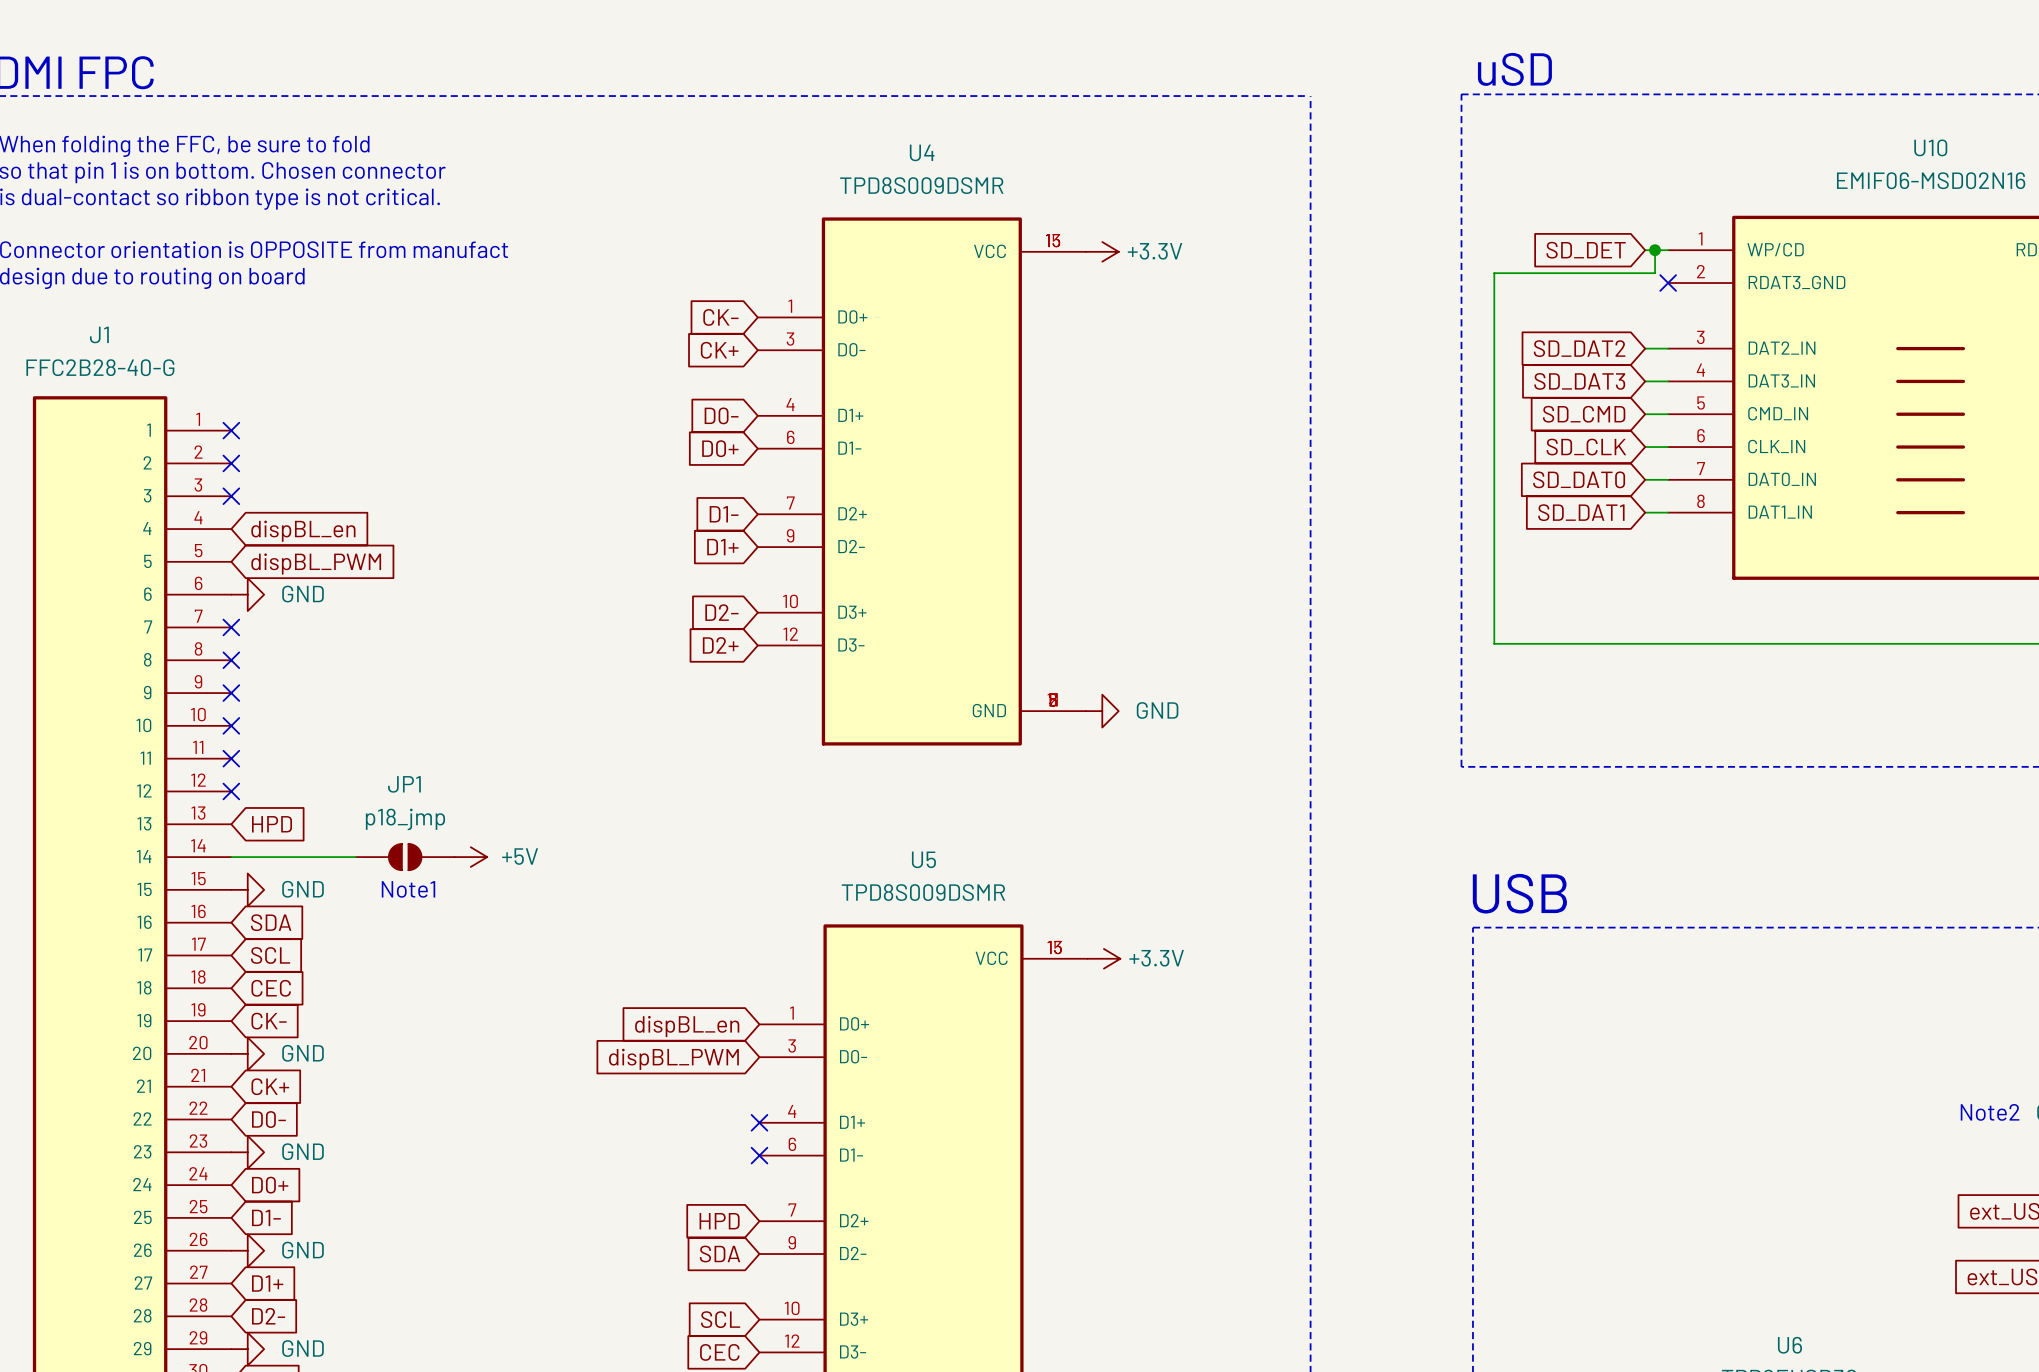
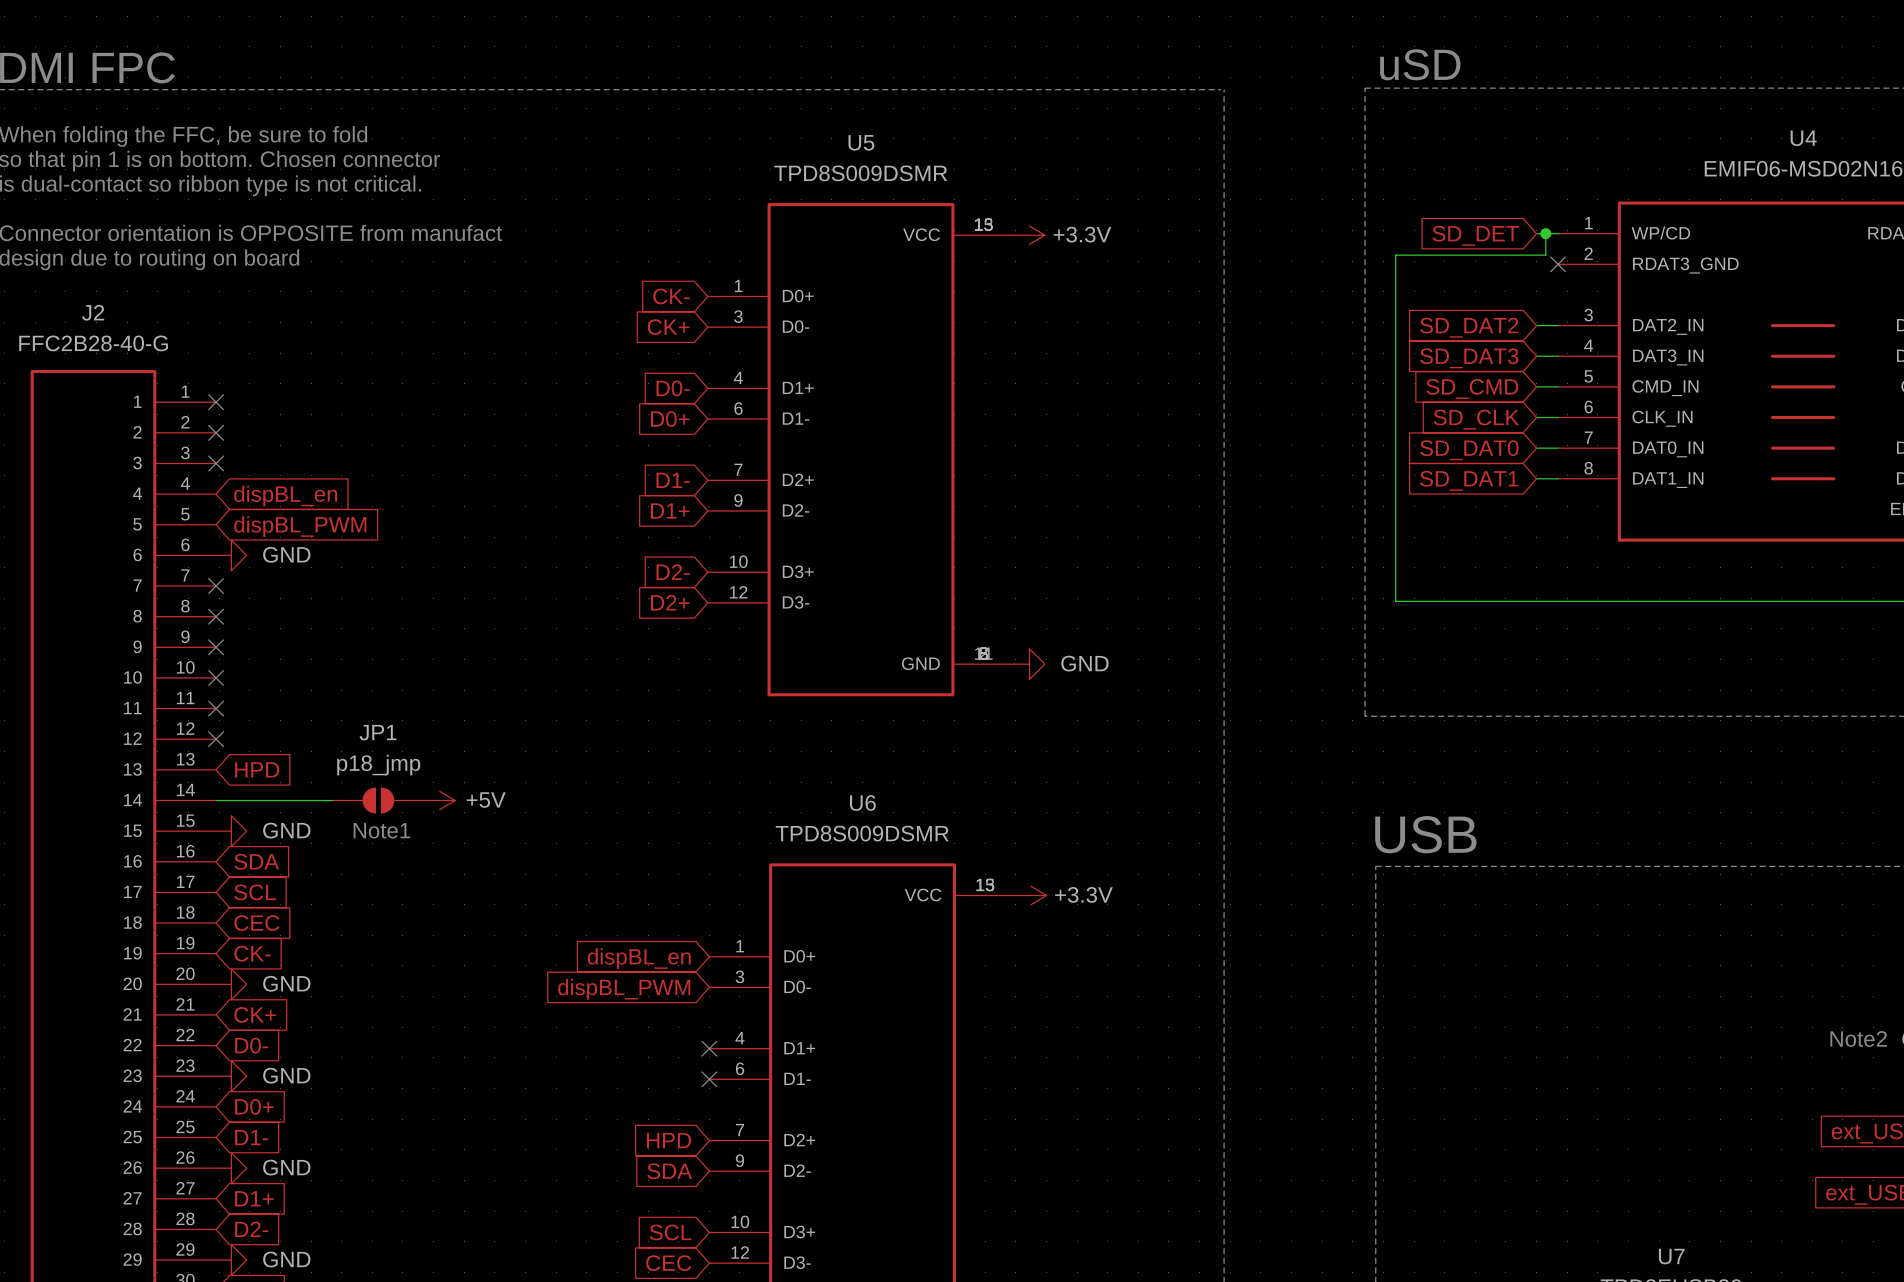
U10 name: U10 (1930, 147) -> U4 (1803, 138)
U4 name: U4 (922, 152) -> U5 (861, 142)
J1 name: J1 (99, 334) -> J2 (93, 312)
U5 name: U5 (923, 859) -> U6 (862, 802)
U6 name: U6 (1789, 1345) -> U7 (1671, 1256)

